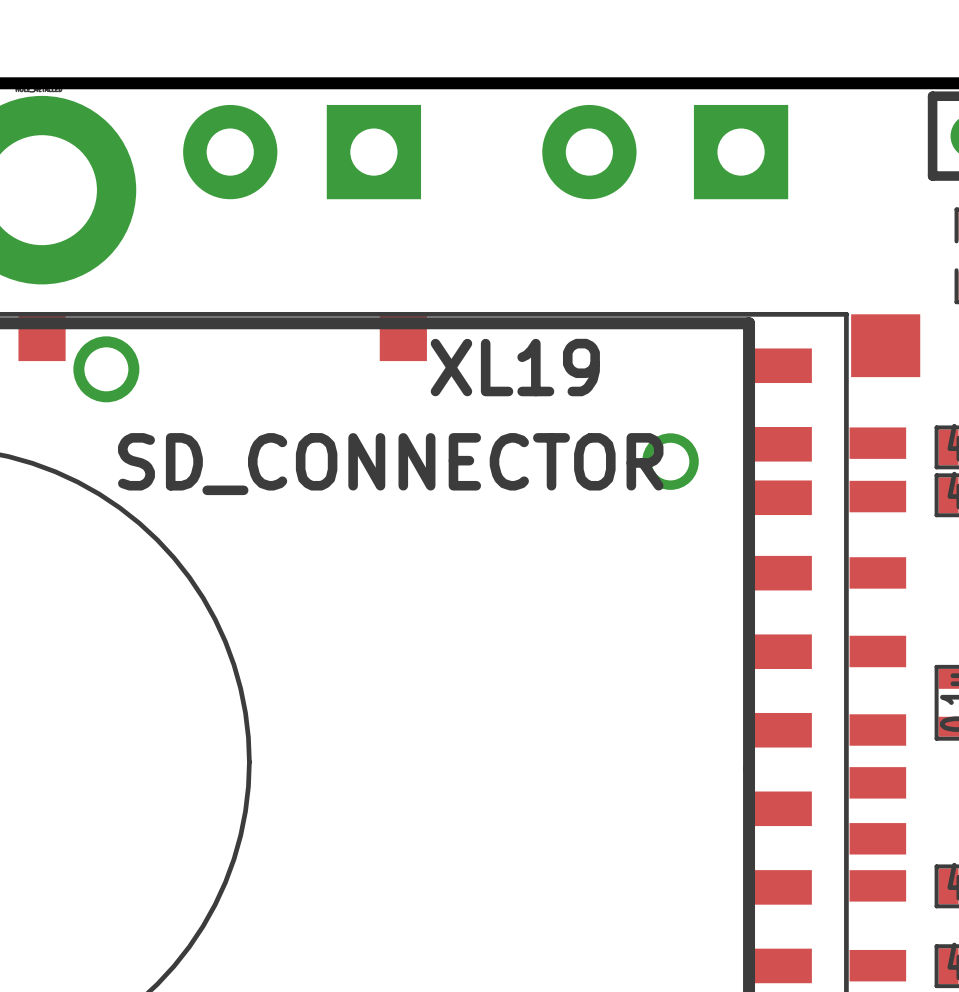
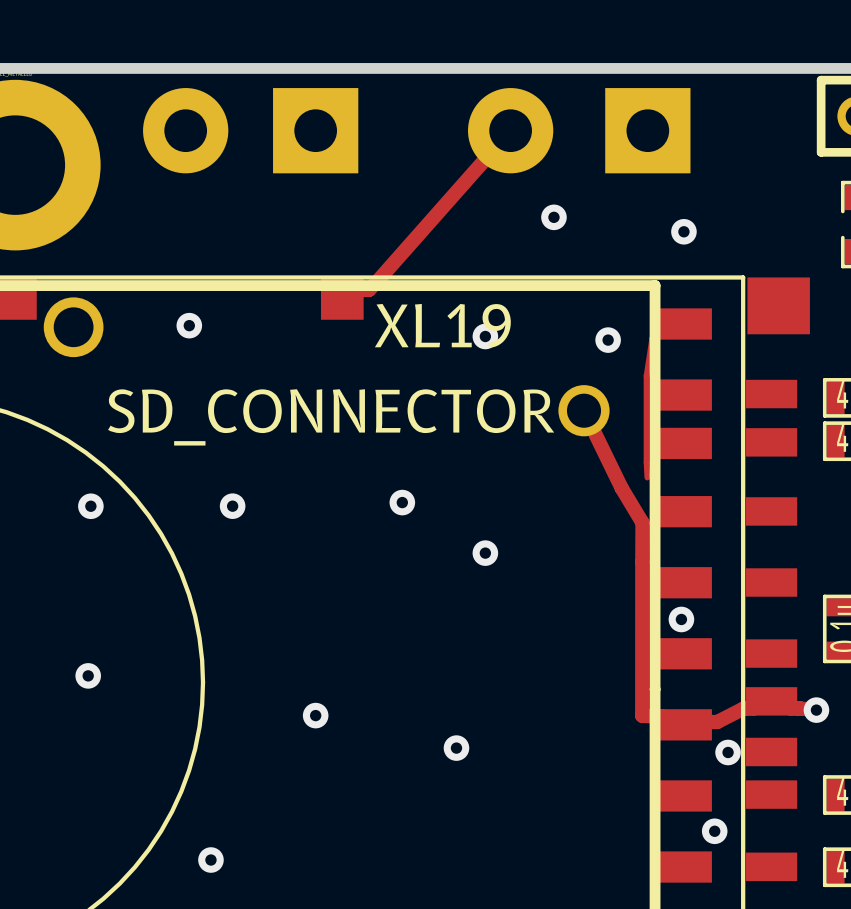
track: none -> (510, 130) (368, 289) (356, 289) (342, 298)
via: none -> (553, 217)
via: none -> (683, 231)
track: none -> (683, 323) (652, 338) (646, 375) (647, 477)
via: none -> (189, 325)
via: none -> (485, 336)
via: none -> (608, 340)
track: none -> (584, 410) (621, 488) (642, 522) (642, 715) (662, 716) (683, 724) (717, 722) (743, 708) (753, 708) (772, 701) (790, 708) (816, 710)
via: none -> (402, 502)
via: none -> (90, 506)
via: none -> (232, 506)
via: none -> (485, 553)
via: none -> (681, 619)
via: none -> (88, 675)
via: none -> (816, 710)
via: none -> (315, 715)
via: none -> (456, 748)
via: none -> (728, 752)
via: none -> (714, 831)
via: none -> (210, 860)

